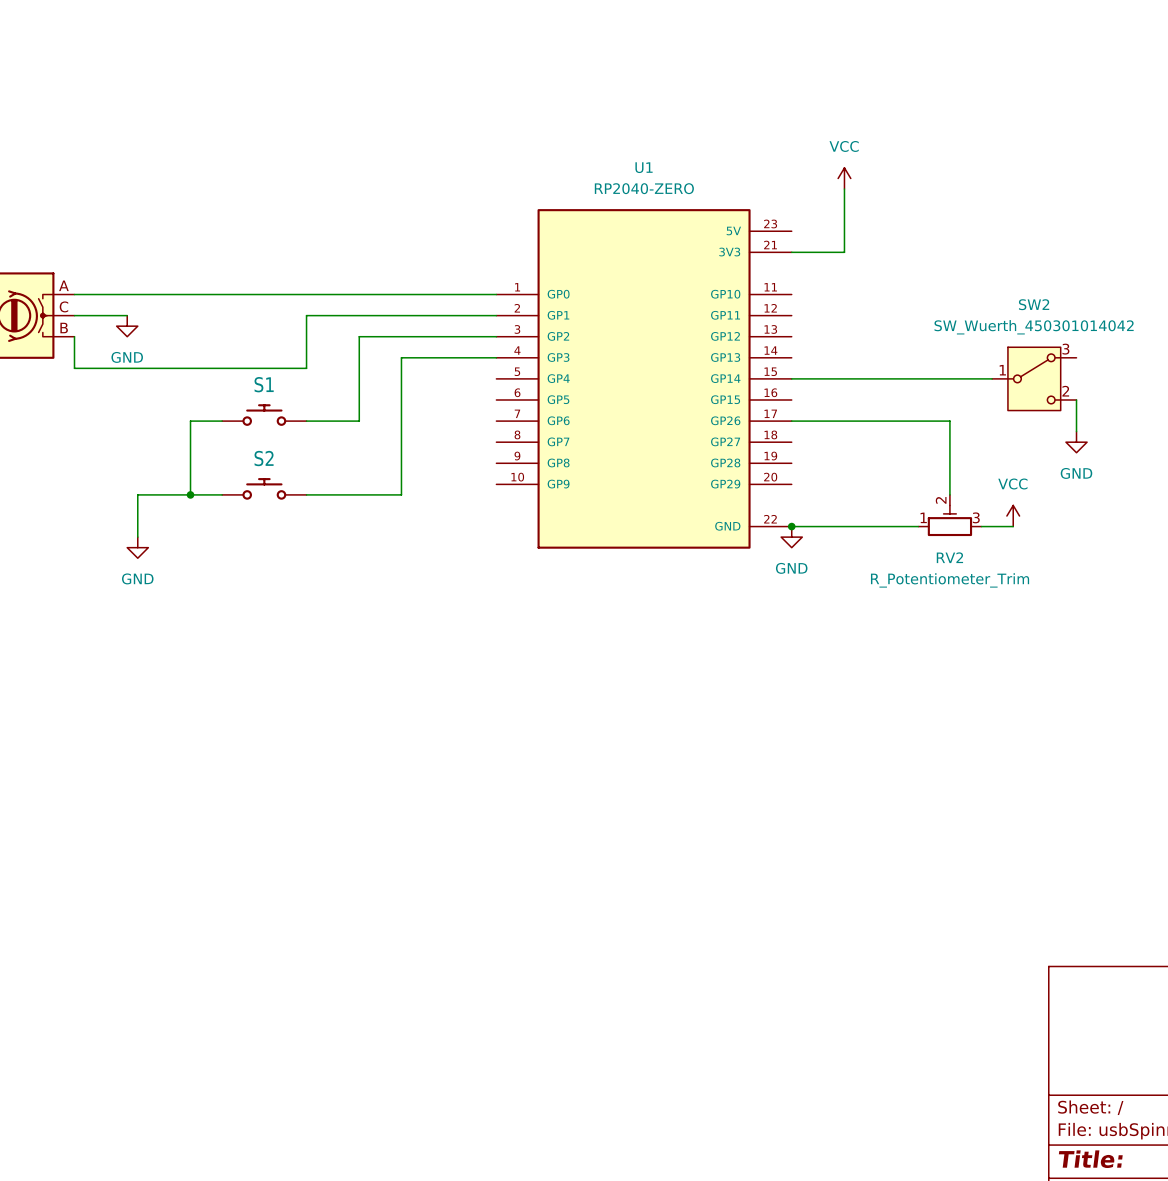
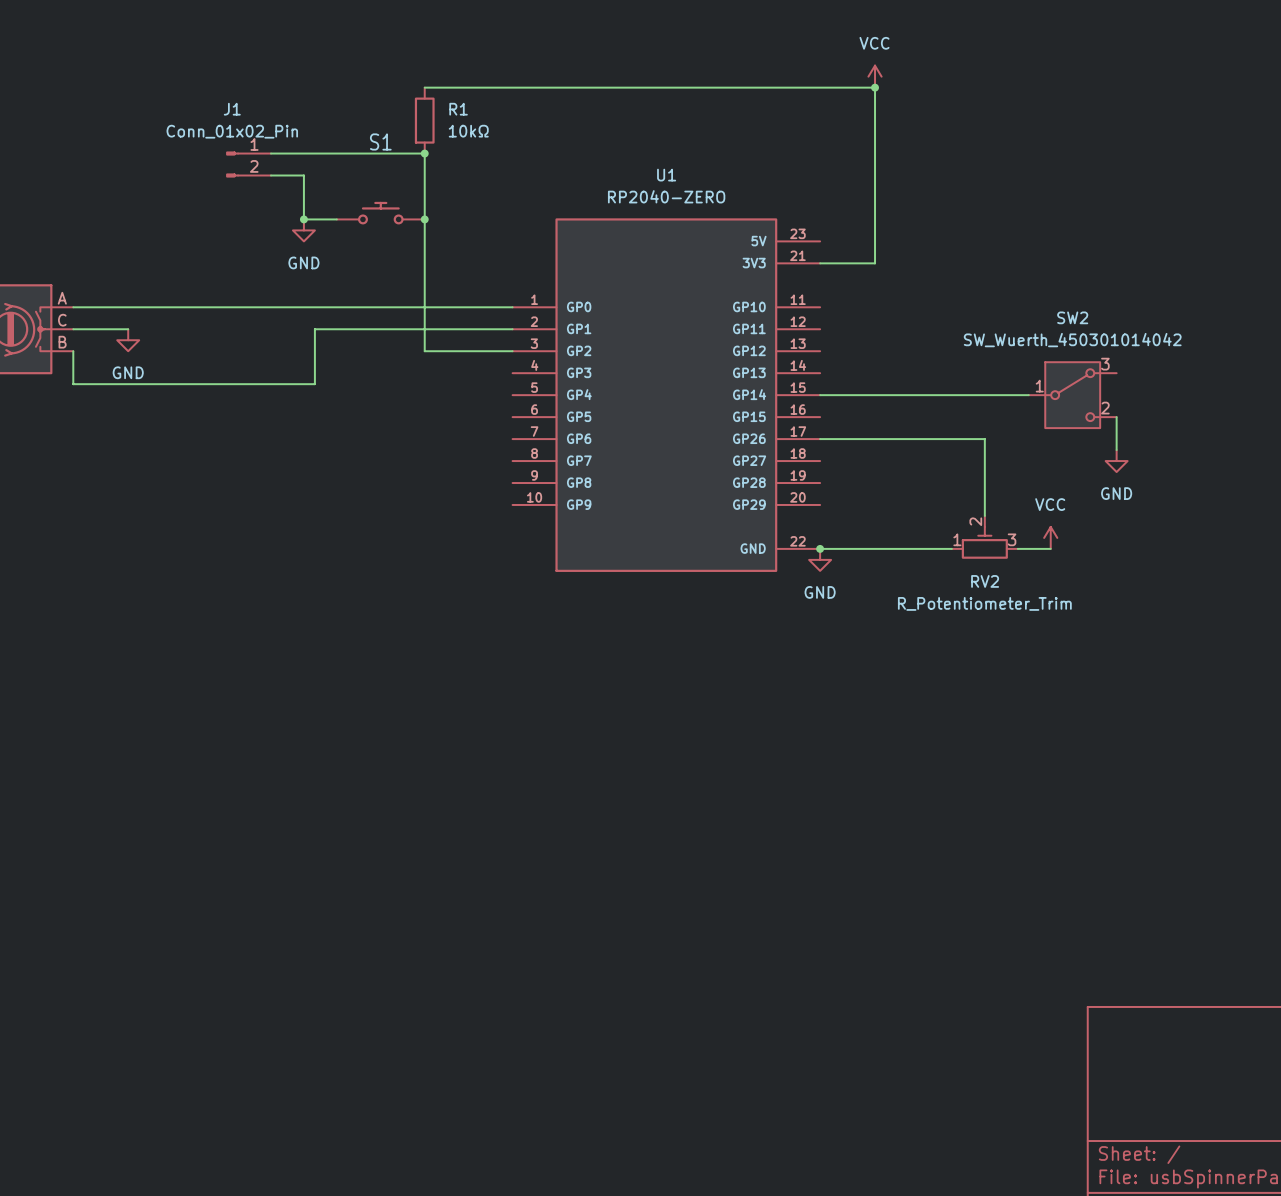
wire: none -> (424, 87) (875, 87) (875, 197)
junction: none -> (875, 87)
R1: none -> 10kΩ (424, 120)
junction: none -> (424, 153)
J1: none -> Conn_01x02_Pin (248, 164)
wire: none -> (270, 175) (303, 175) (303, 219) (336, 219)
power symbol position: VCC (844, 178) -> VCC (875, 76)
junction: none -> (303, 219)
junction: none -> (424, 219)
power symbol: none -> GND (303, 230)
wire: (412, 336) (359, 336) (359, 421) (306, 421) -> (424, 351) (424, 153) (270, 153)
wire: (496, 357) (401, 357) (401, 494) (306, 494) -> none
S1 name position: S1 (264, 384) -> S1 (380, 141)
S1 position: (264, 415) -> (380, 213)
wire: (222, 421) (190, 421) (190, 494) -> none
S2: (264, 488) -> none
junction: (190, 494) -> none
wire: (222, 494) (137, 494) (137, 537) -> none
power symbol: GND (137, 547) -> none

